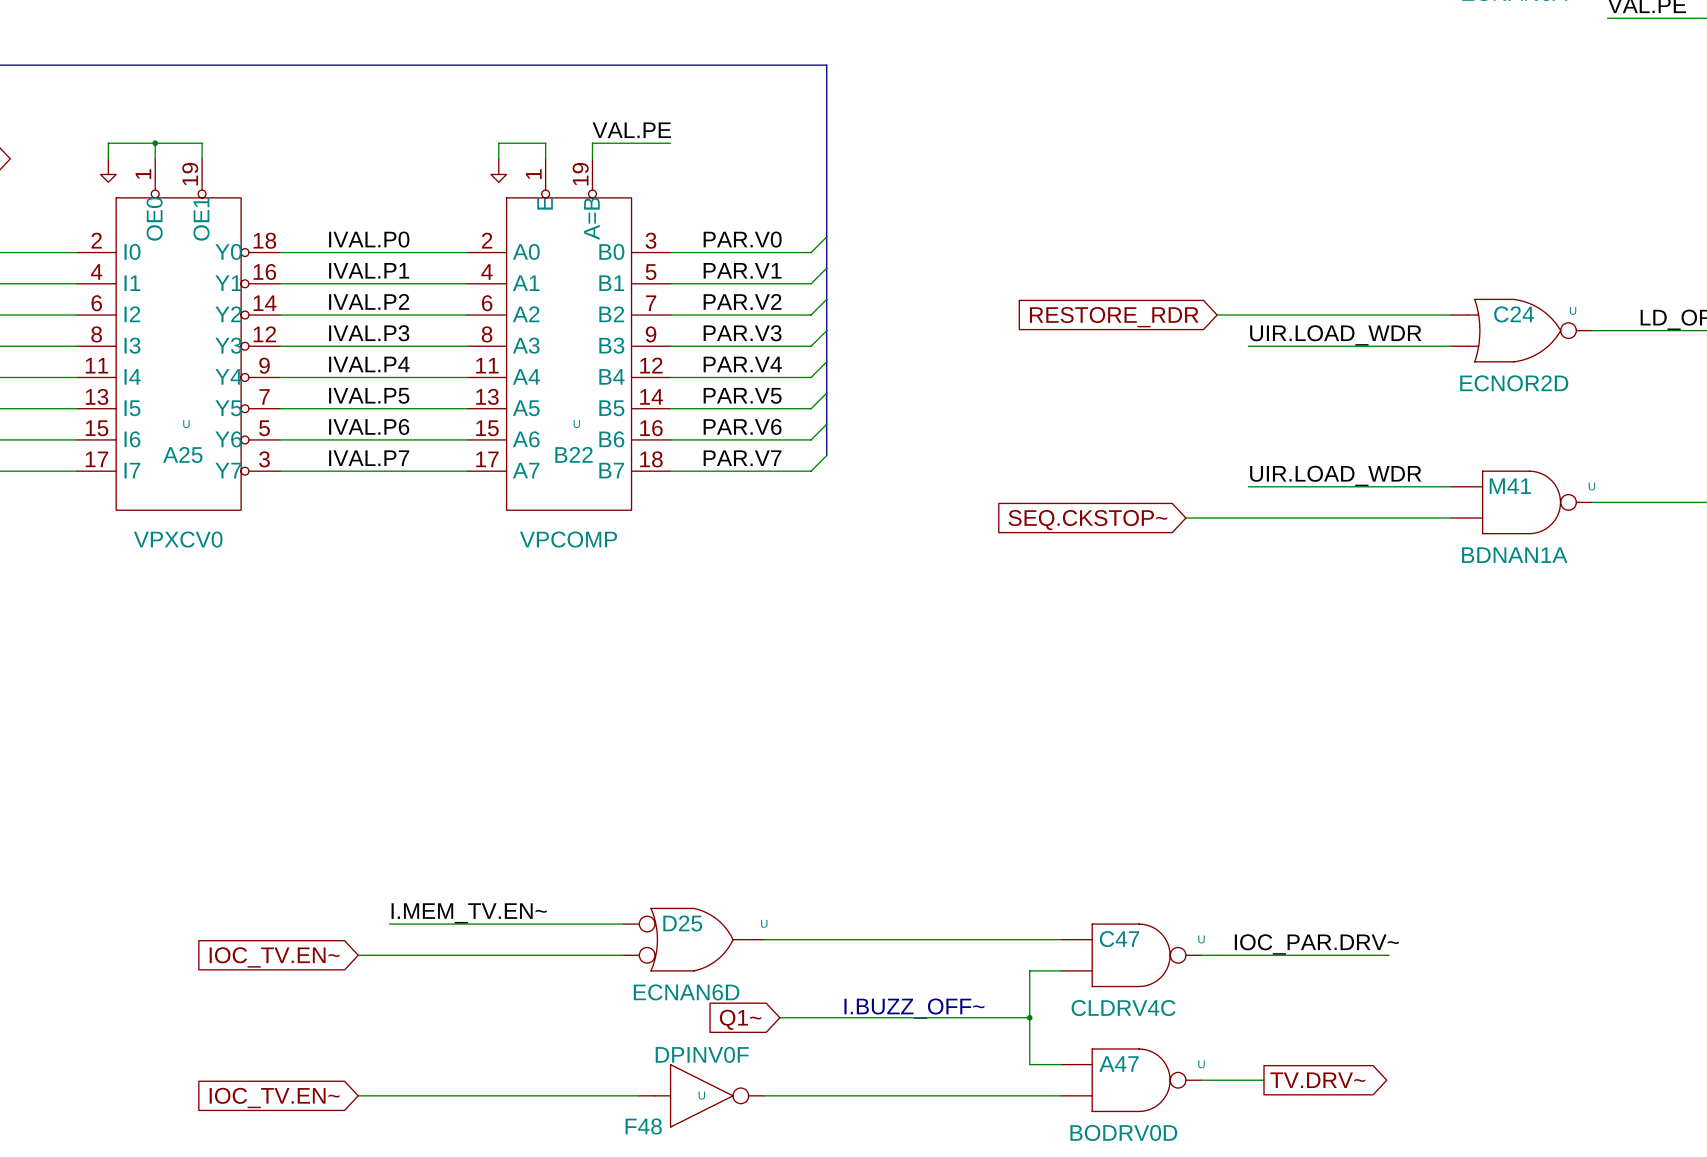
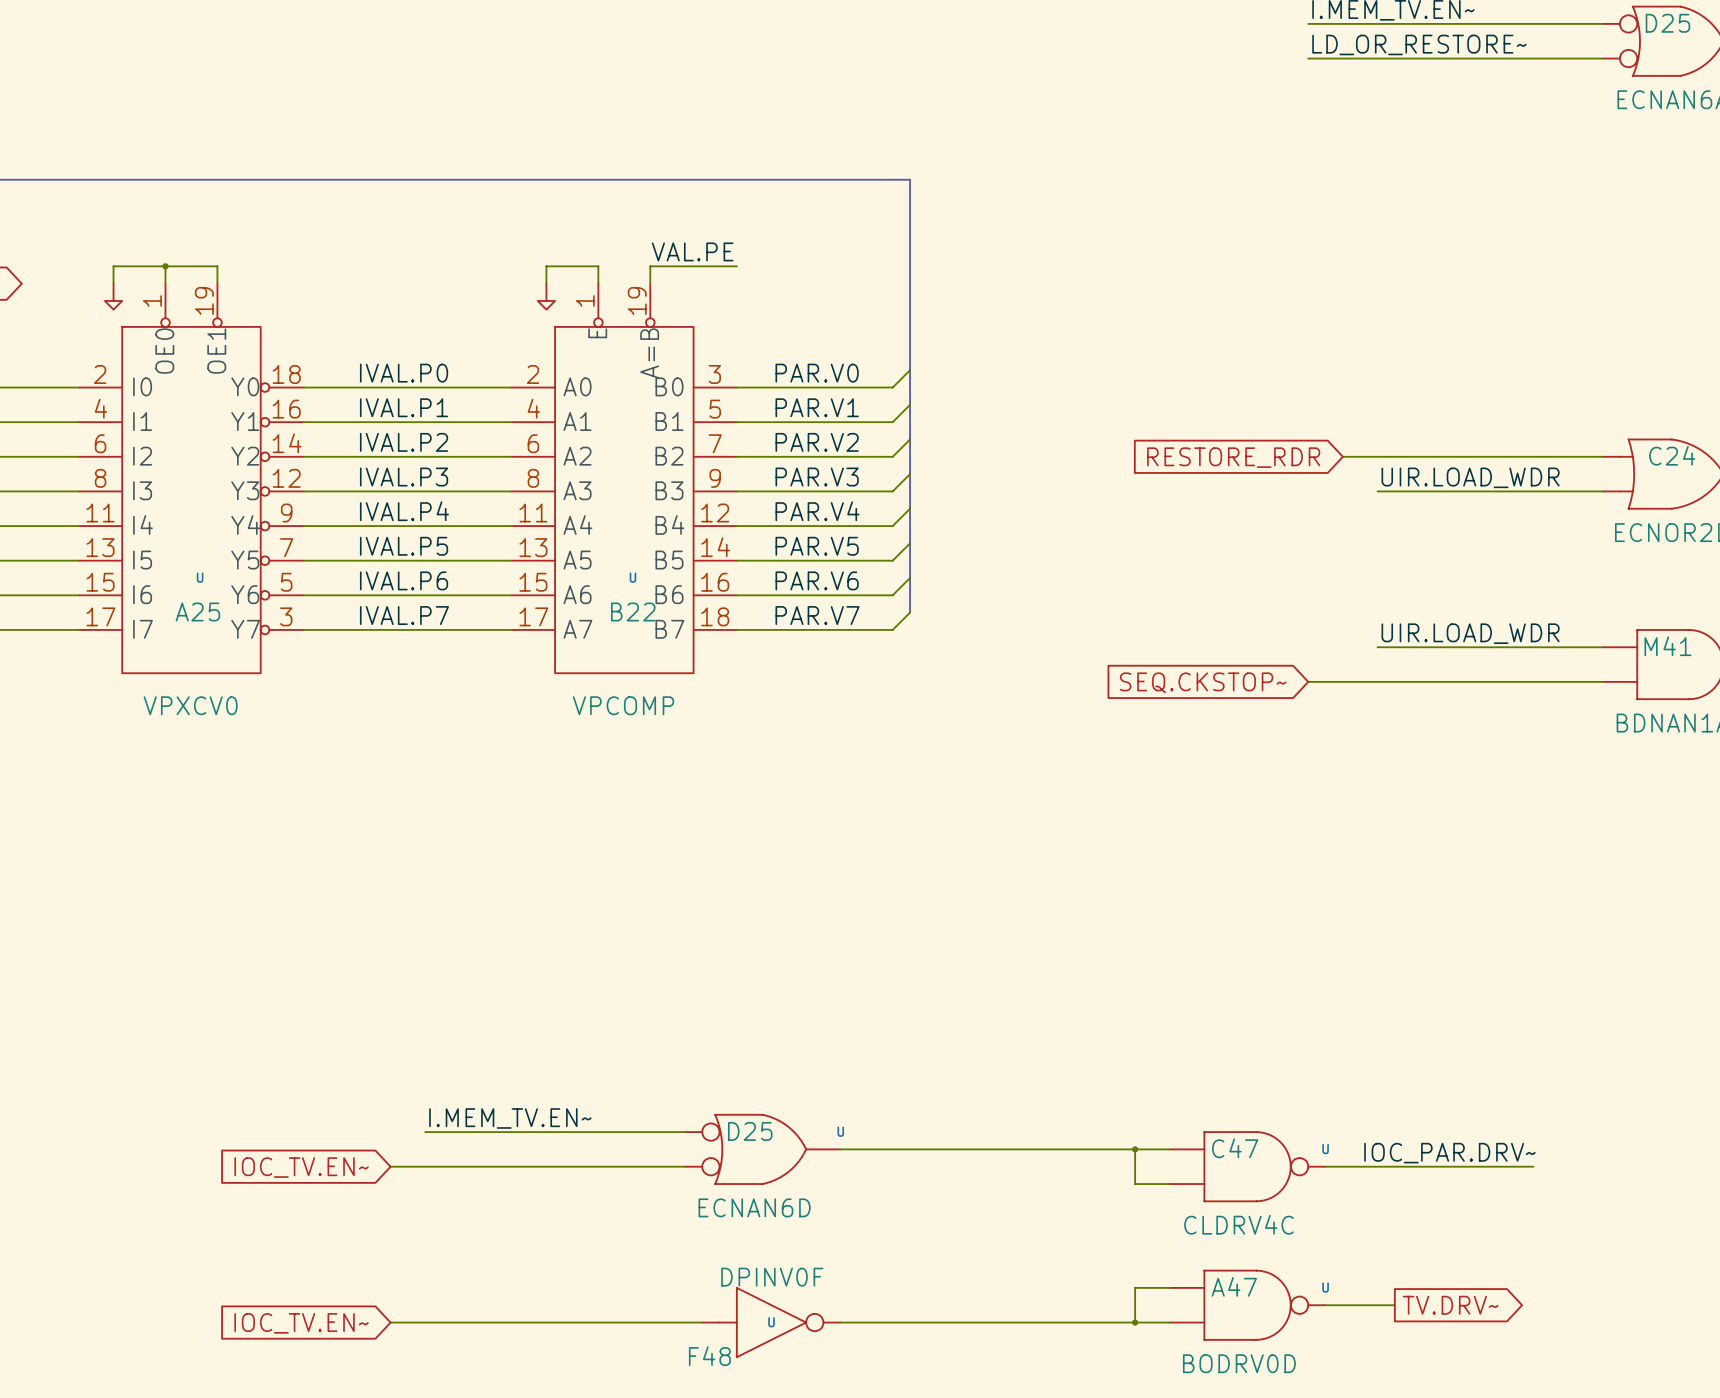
wire: none -> (1135, 1149) (1135, 1184)
junction: none -> (1135, 1149)
wire: (1029, 970) (1029, 1064) -> (1135, 1322) (1135, 1287)
text: I.BUZZ_OFF~ (914, 1008) -> none
wire: (779, 1017) (1029, 1017) -> none
junction: (1029, 1017) -> none
global label: Q1~ (740, 1019) -> none
junction: none -> (1135, 1322)

